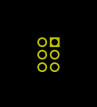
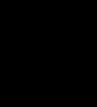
part: (48, 54) -> none

